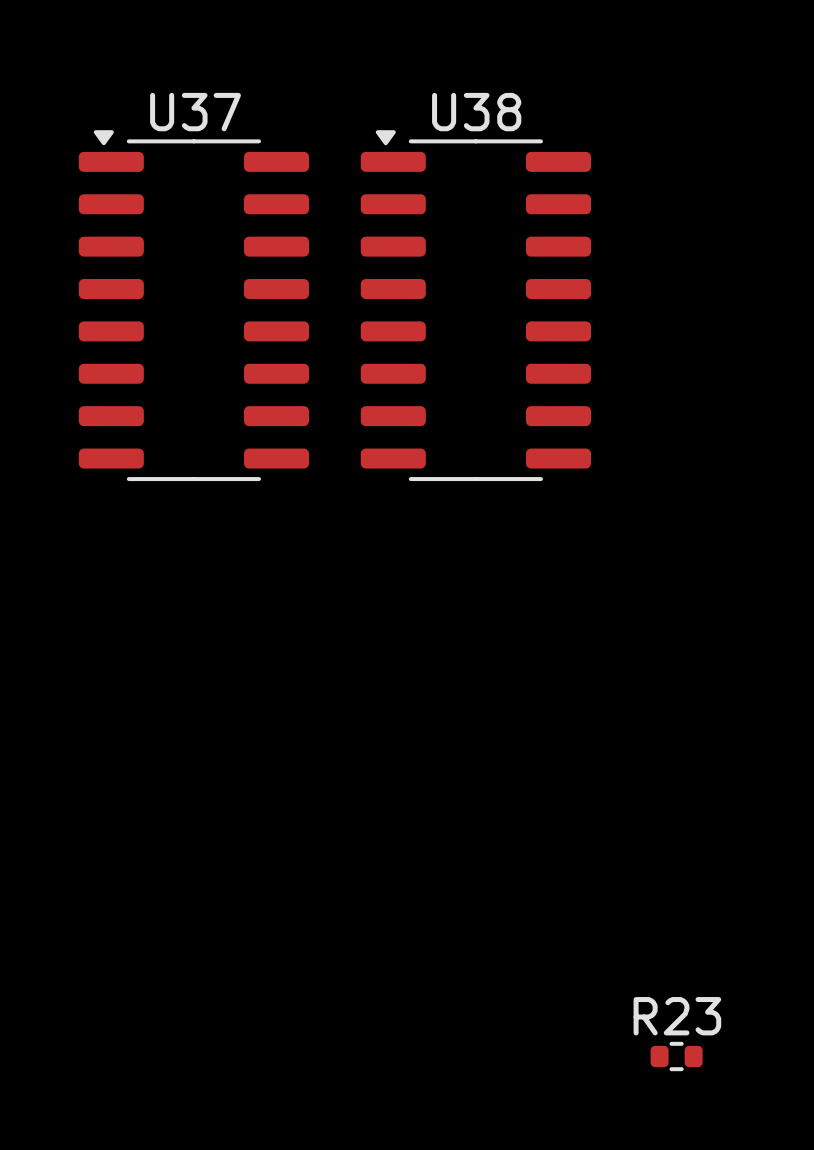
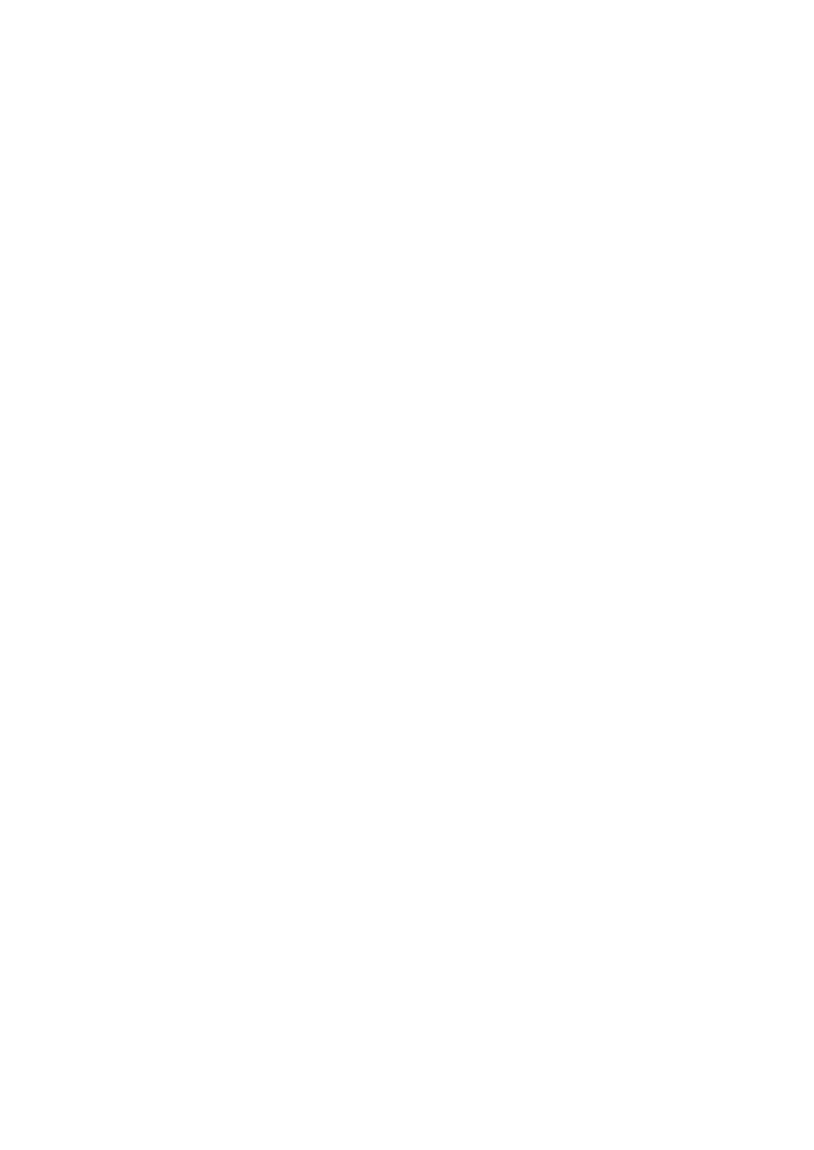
U37: (193, 305) -> none
U38: (475, 305) -> none
R23: (676, 1056) -> none

